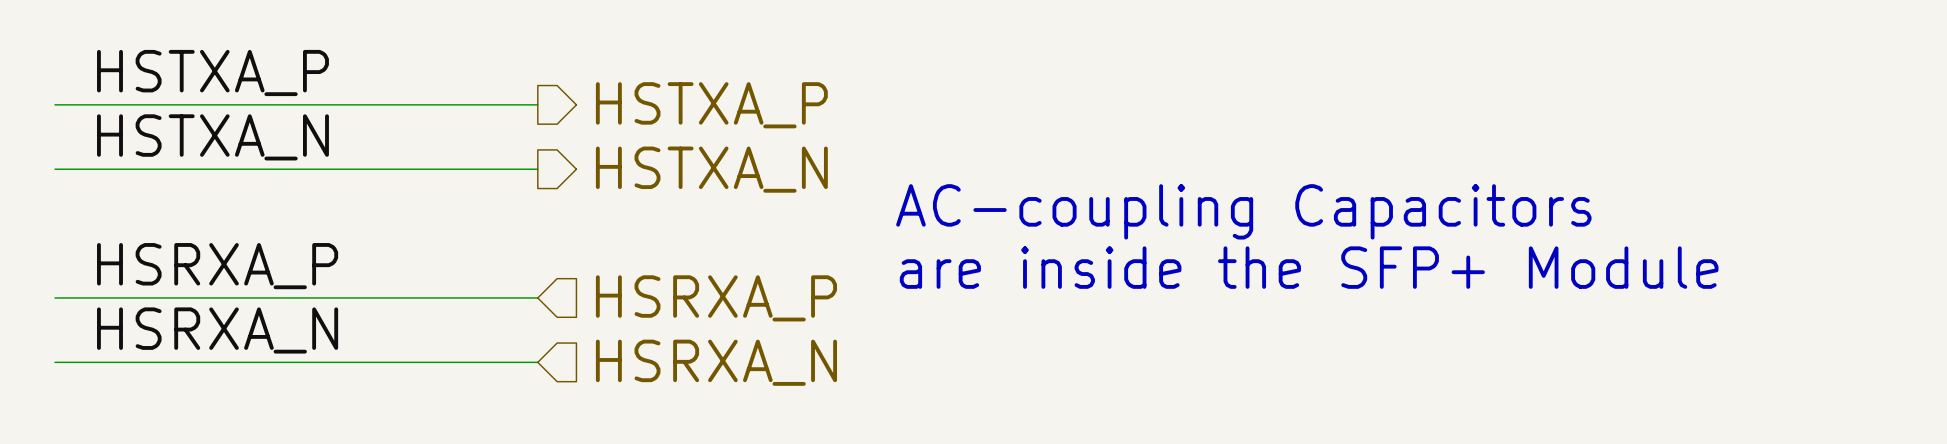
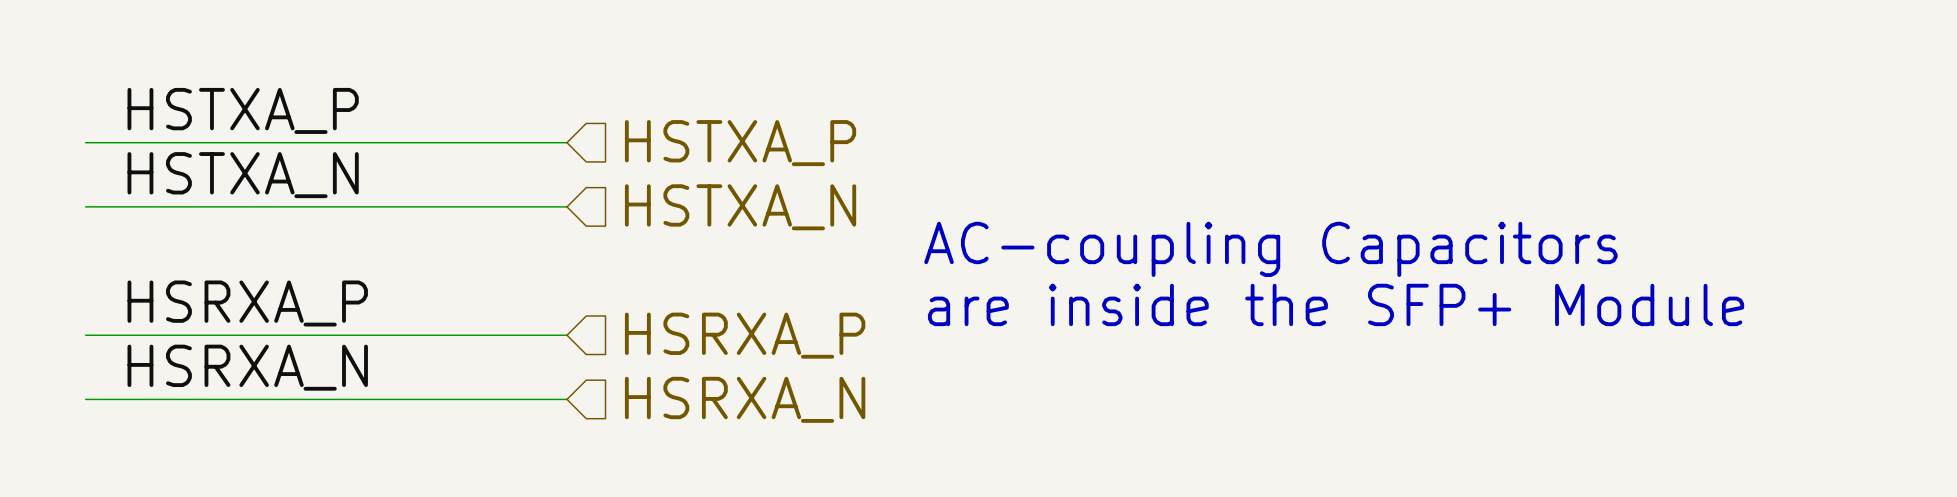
hierarchical label shape: output (711, 105) -> input (740, 143)
hierarchical label shape: output (711, 169) -> input (740, 207)

